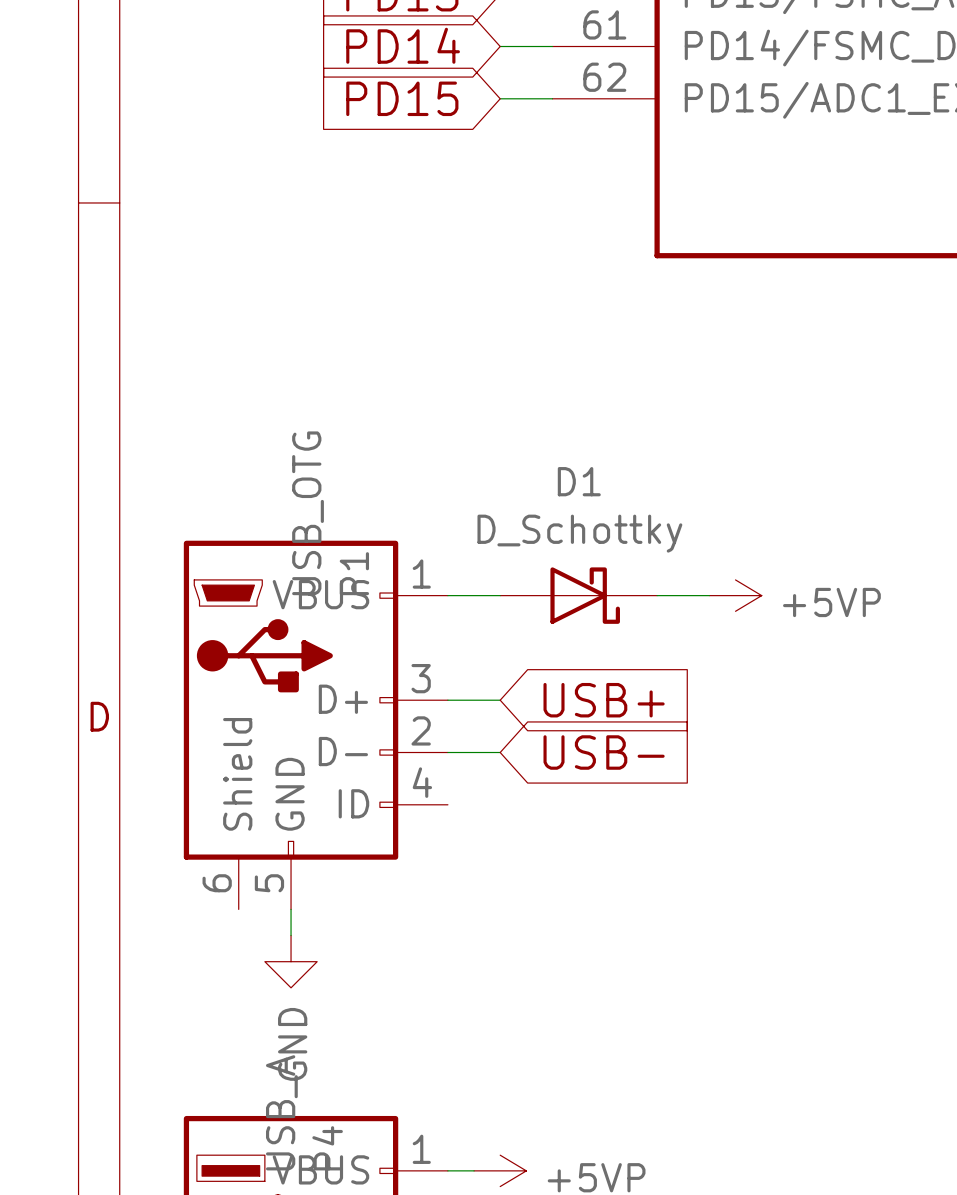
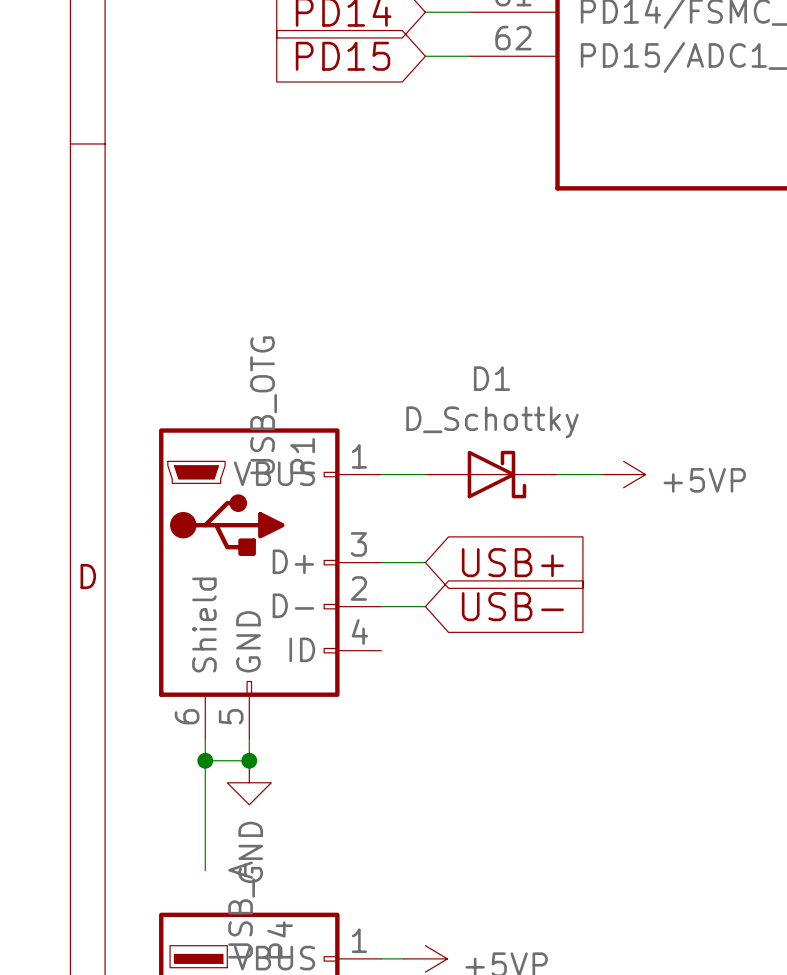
wire: none -> (205, 738) (205, 870)
wire: none -> (205, 760) (249, 760)
junction: none -> (205, 760)
junction: none -> (249, 760)

